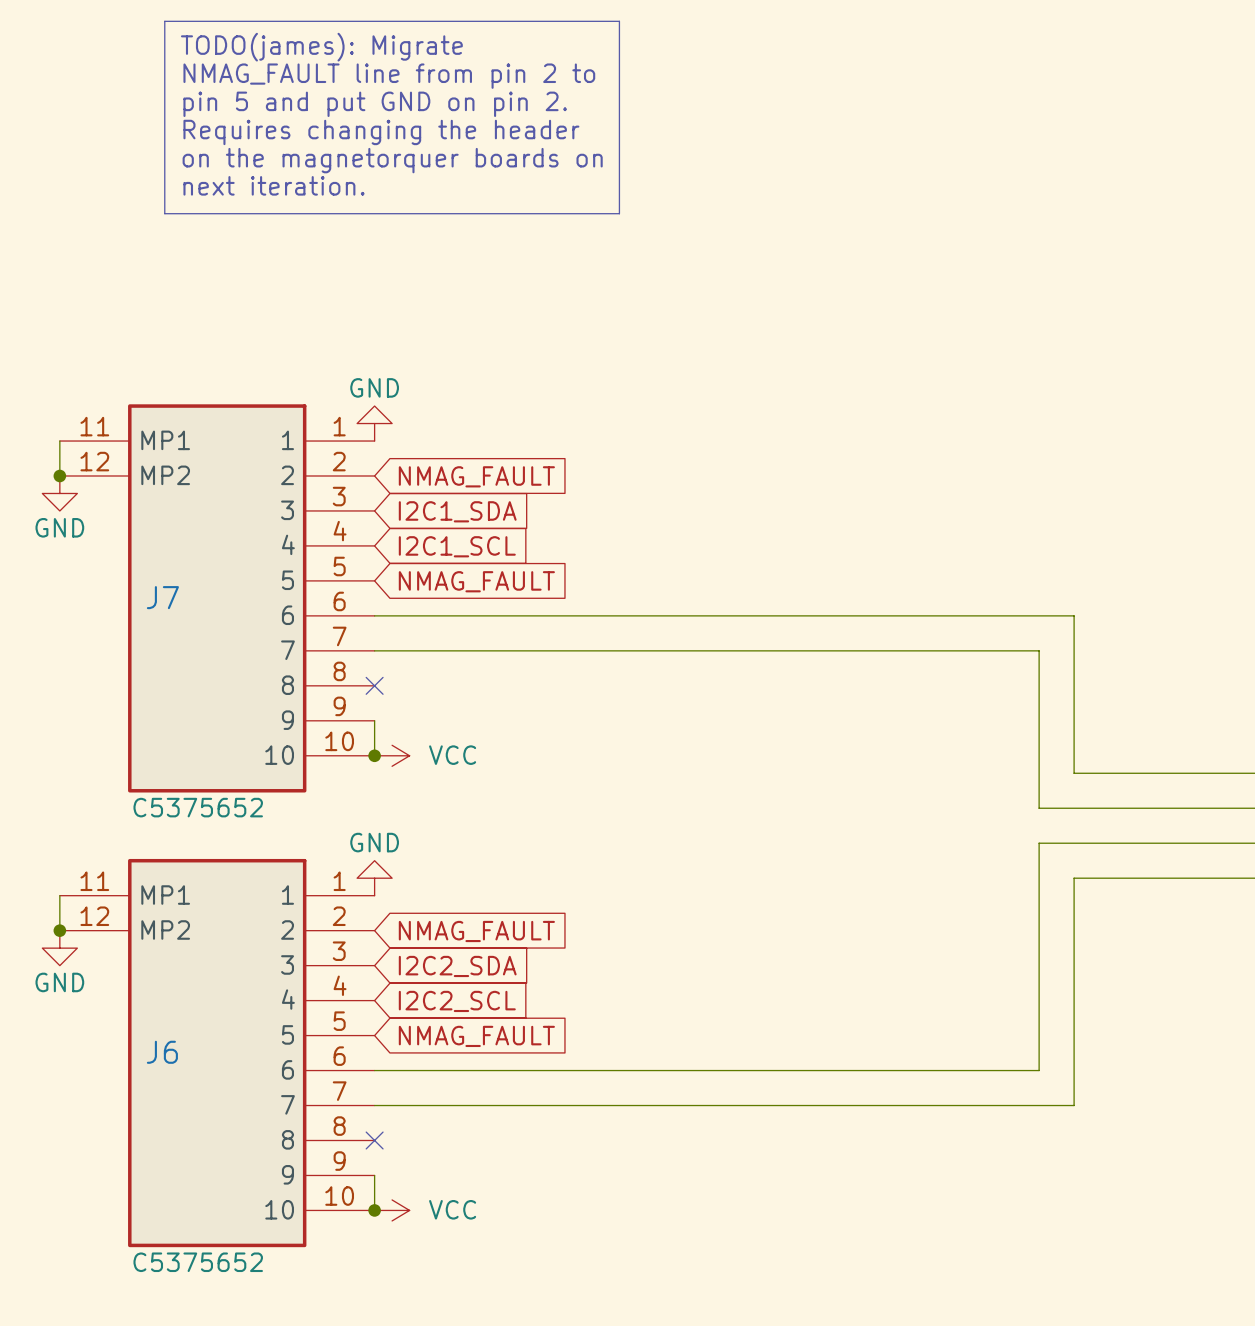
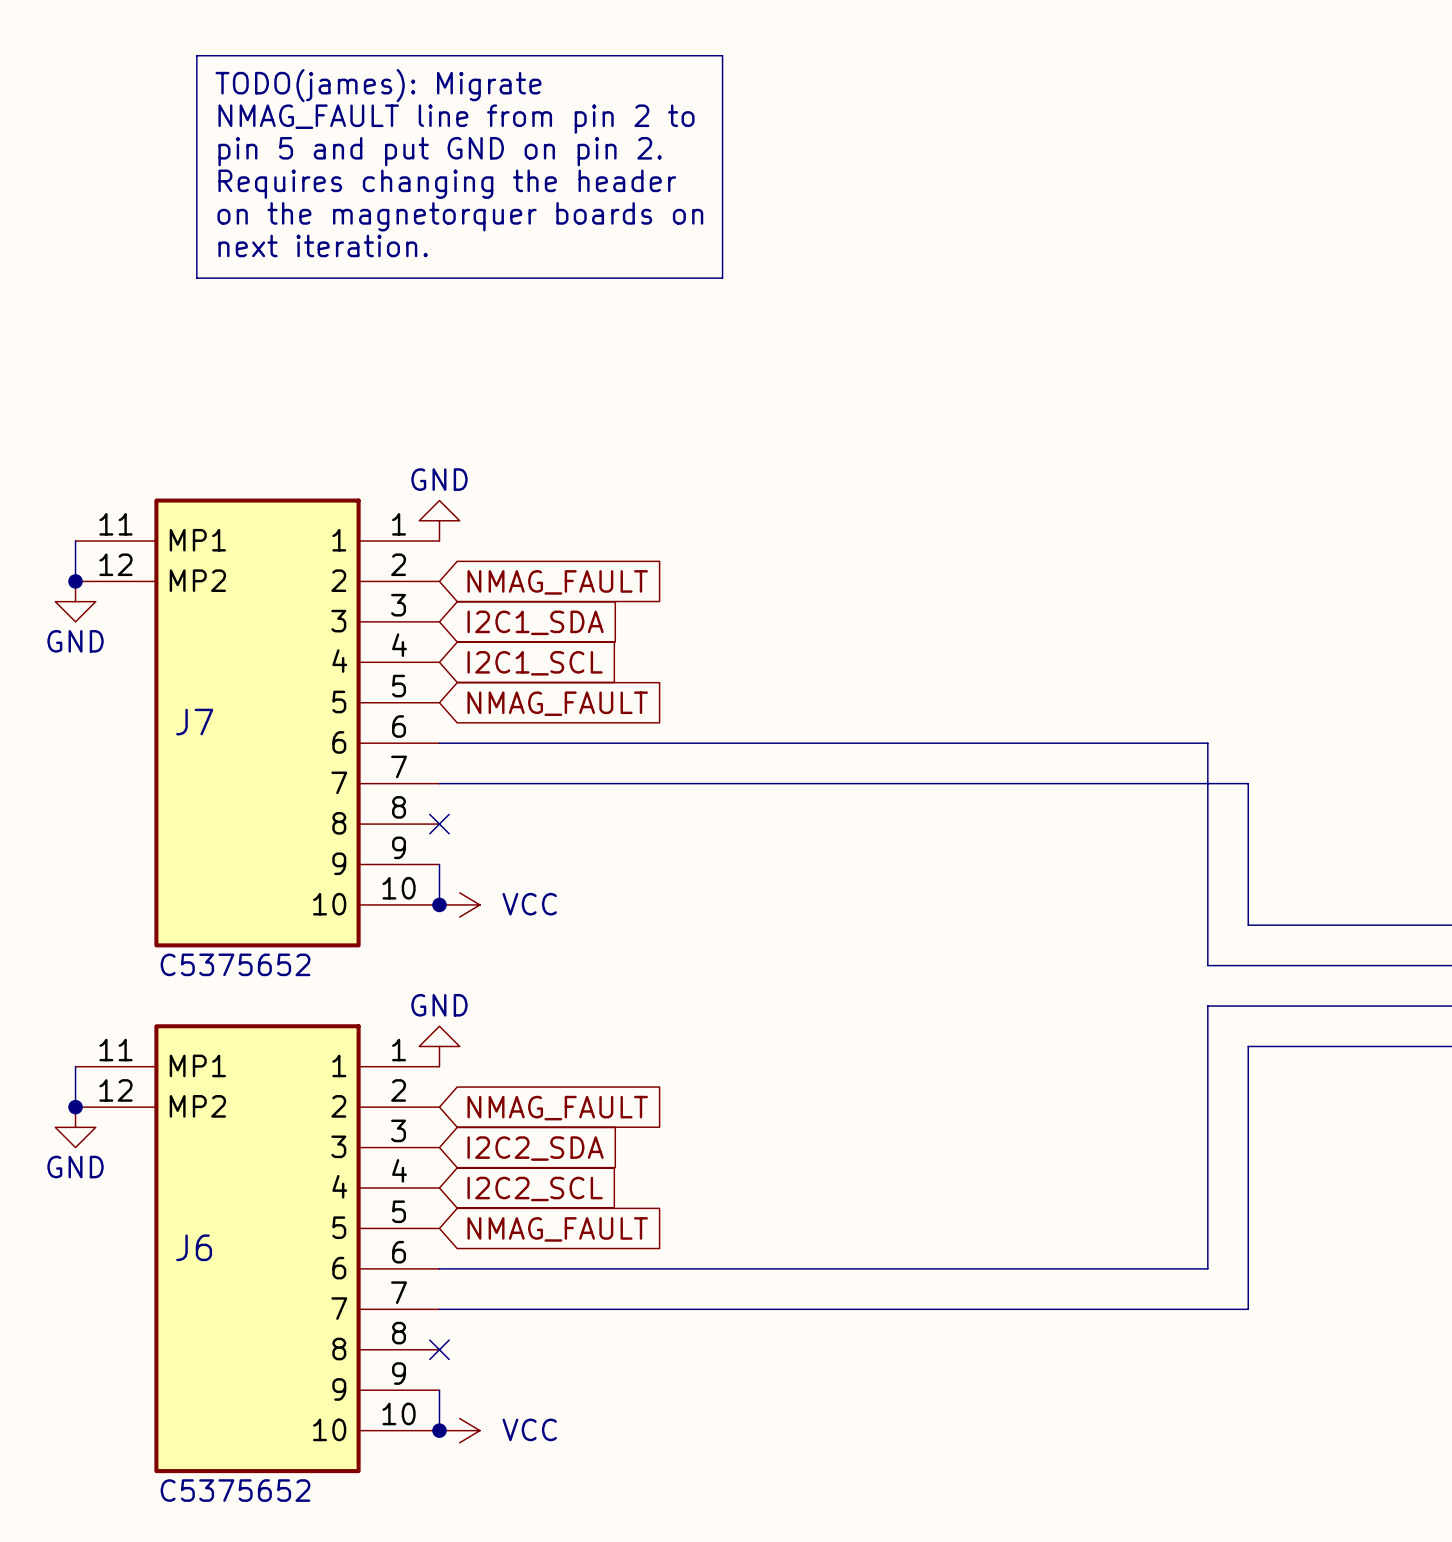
wire: (1039, 615) (1074, 615) (1074, 650) -> (1207, 743) (1207, 783) (1248, 783)

